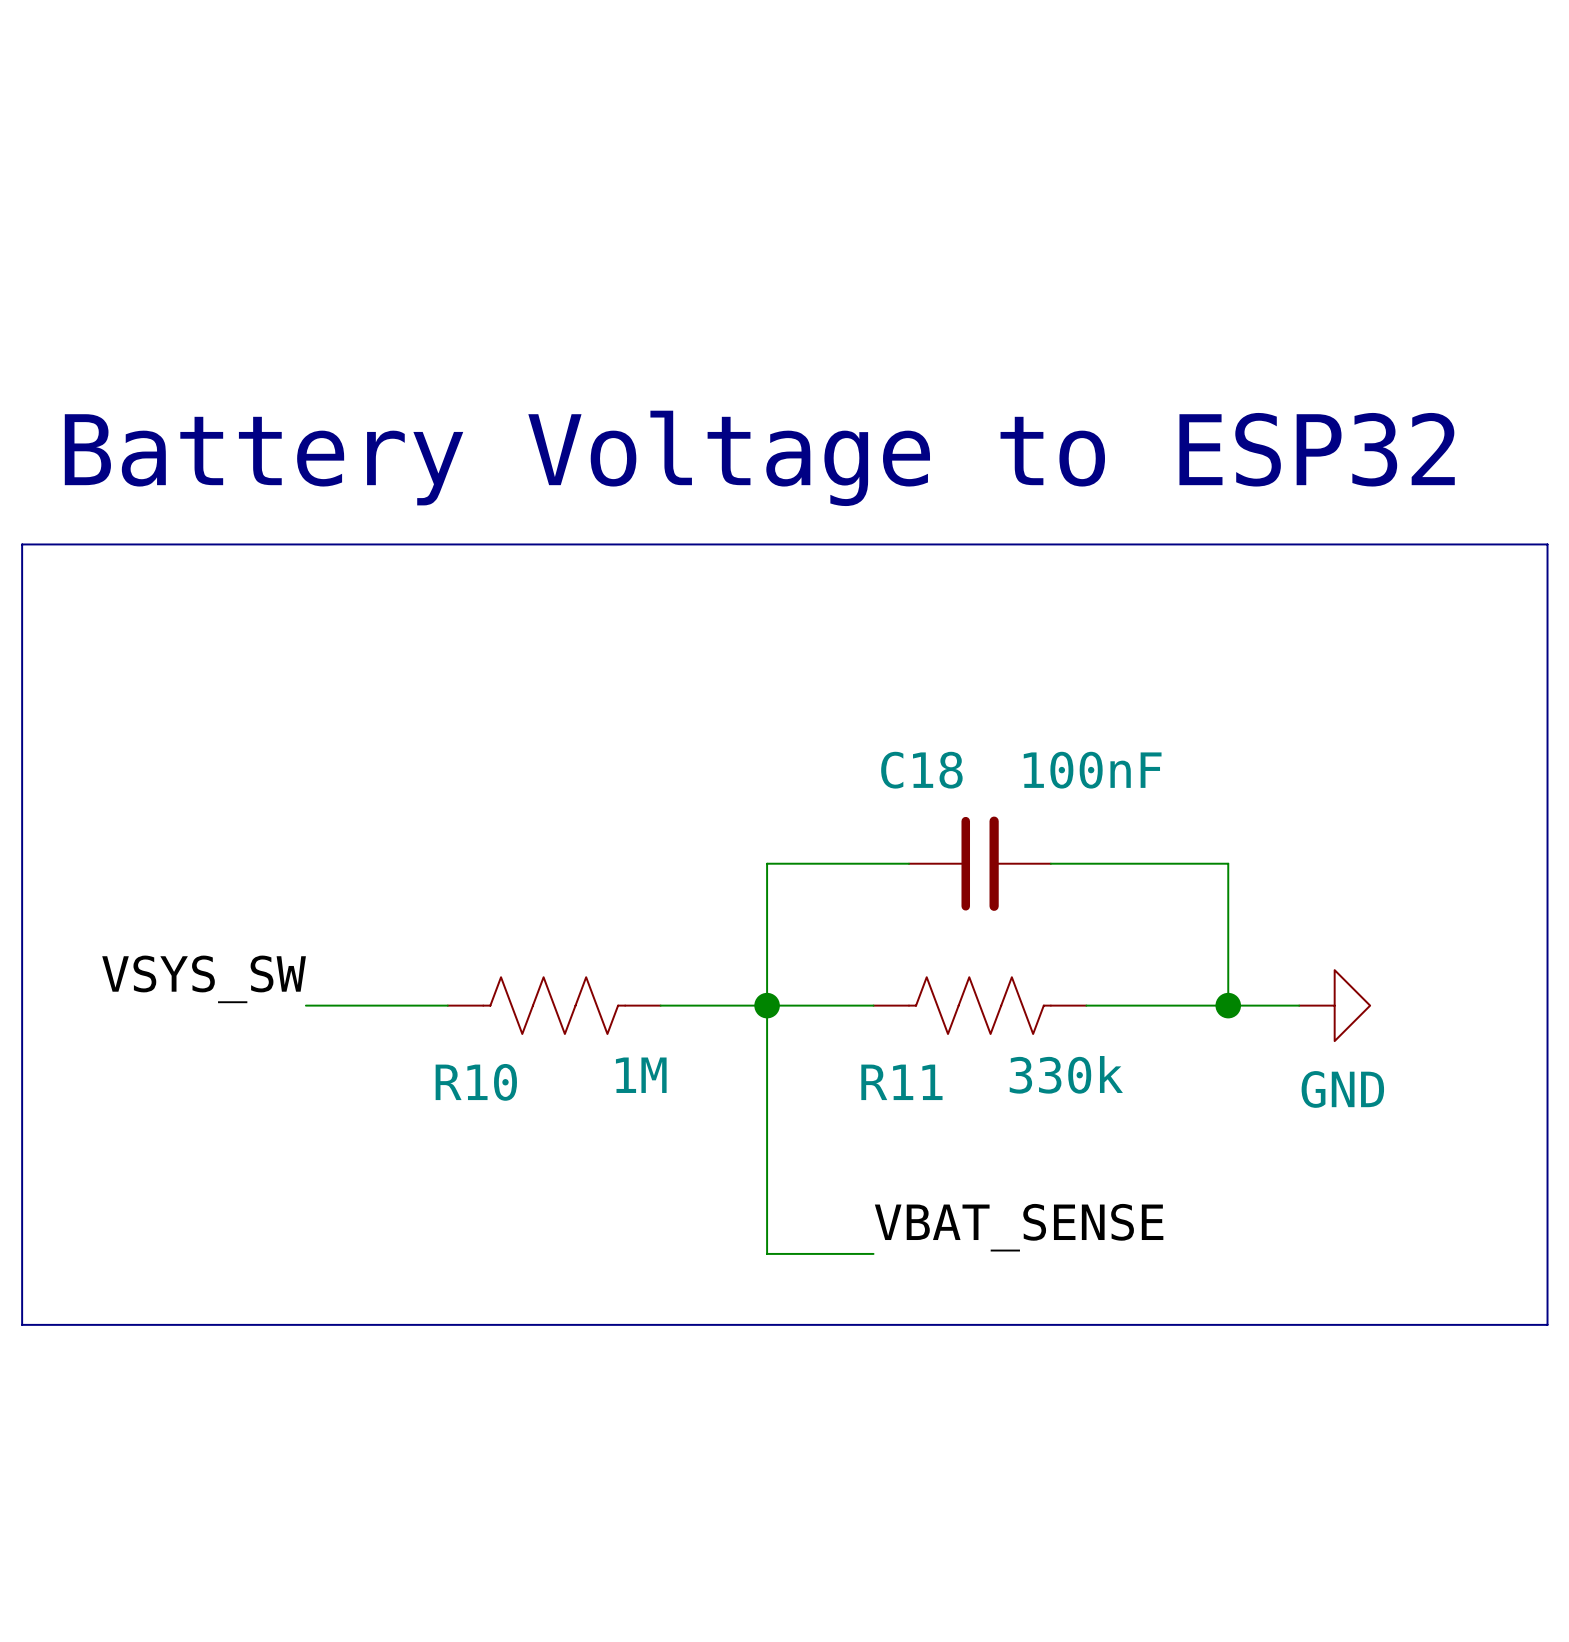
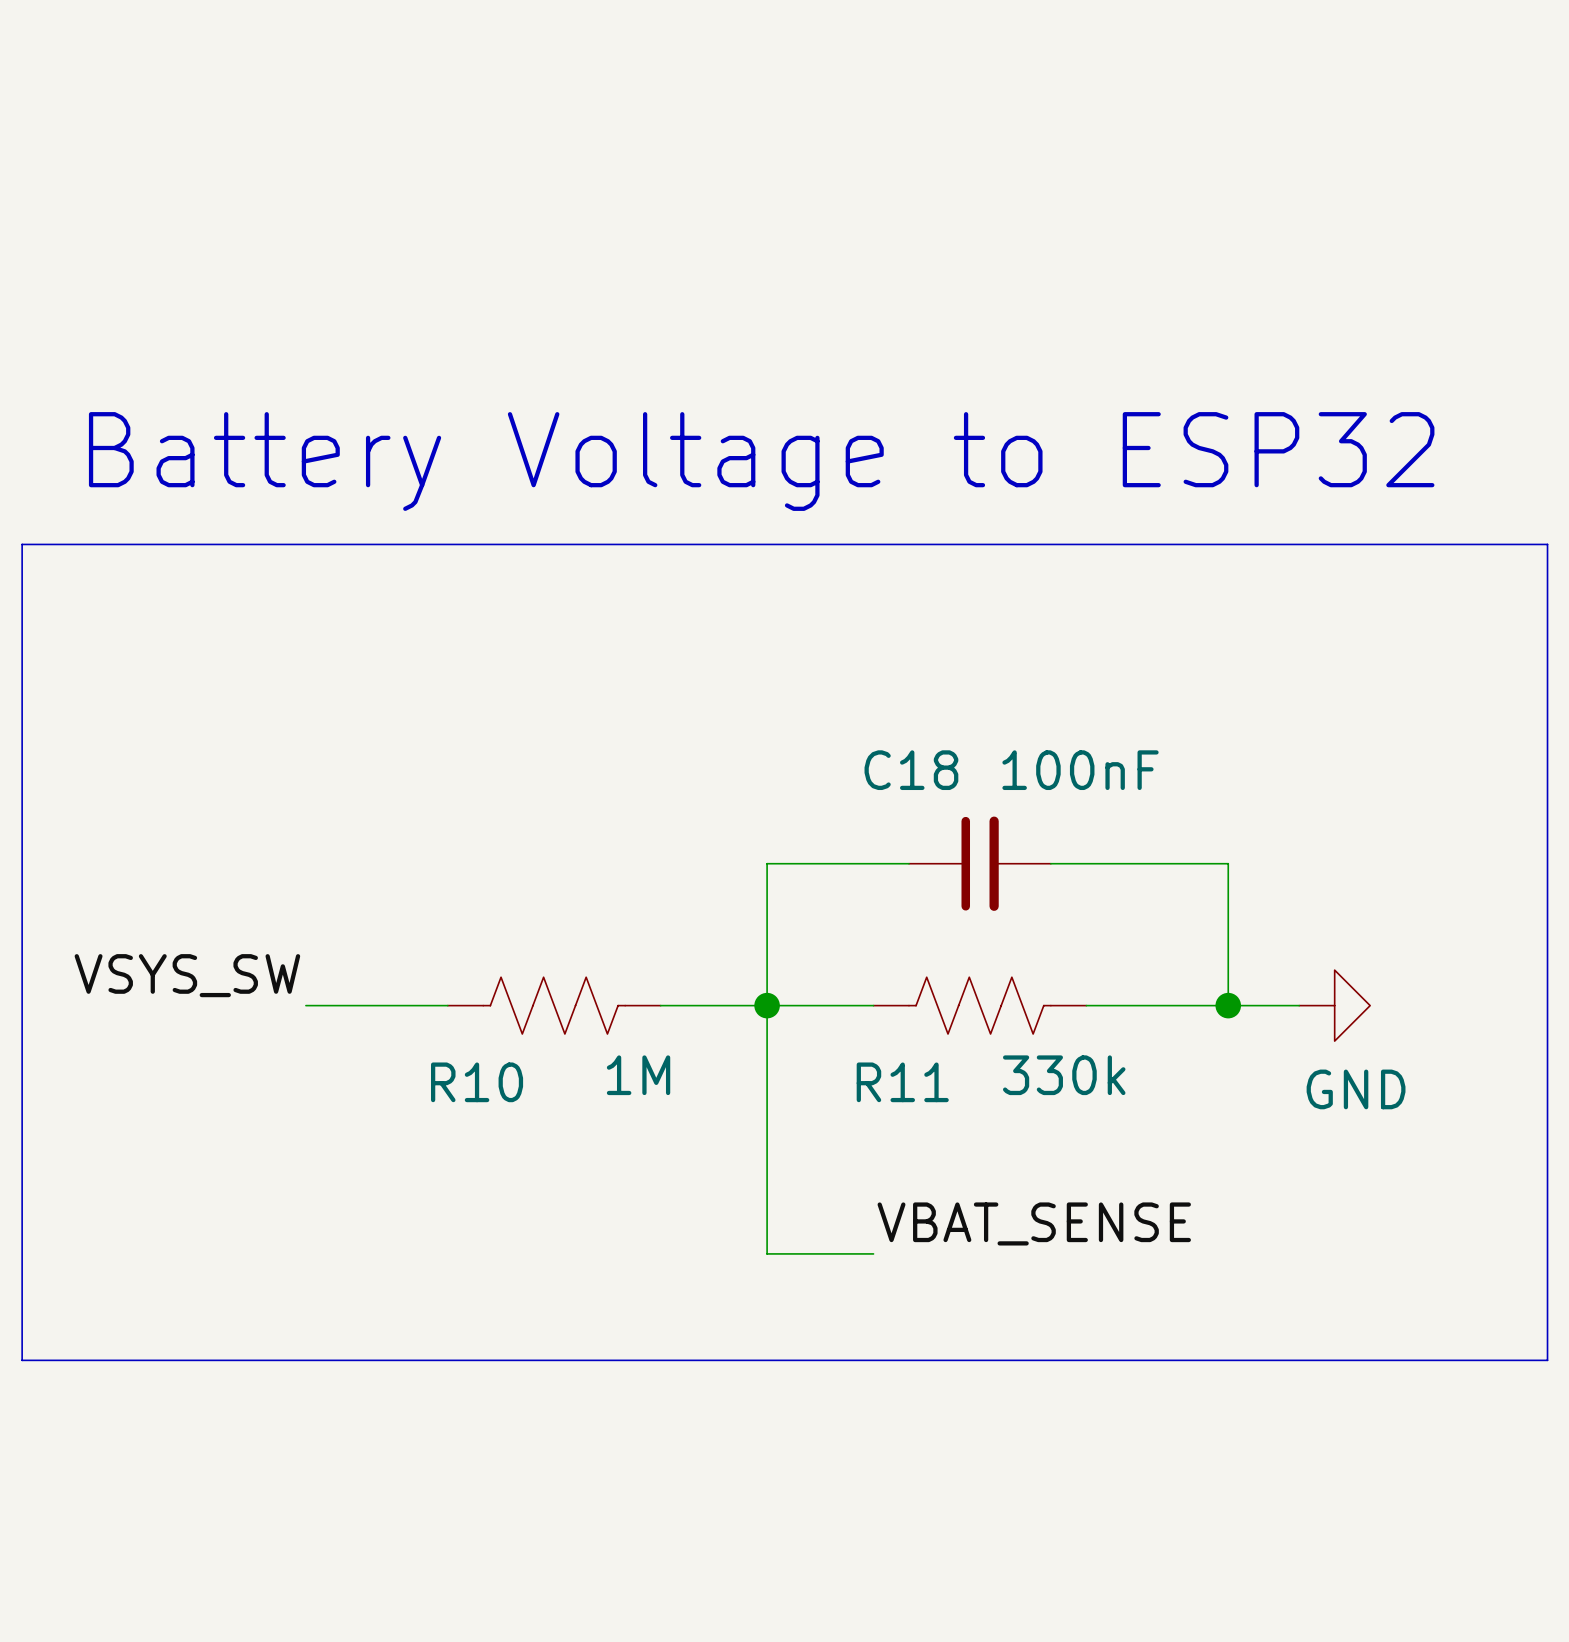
line: (22, 1324) (1547, 1324) -> (22, 1324) (22, 1360) (1547, 1360) (1547, 1324)

